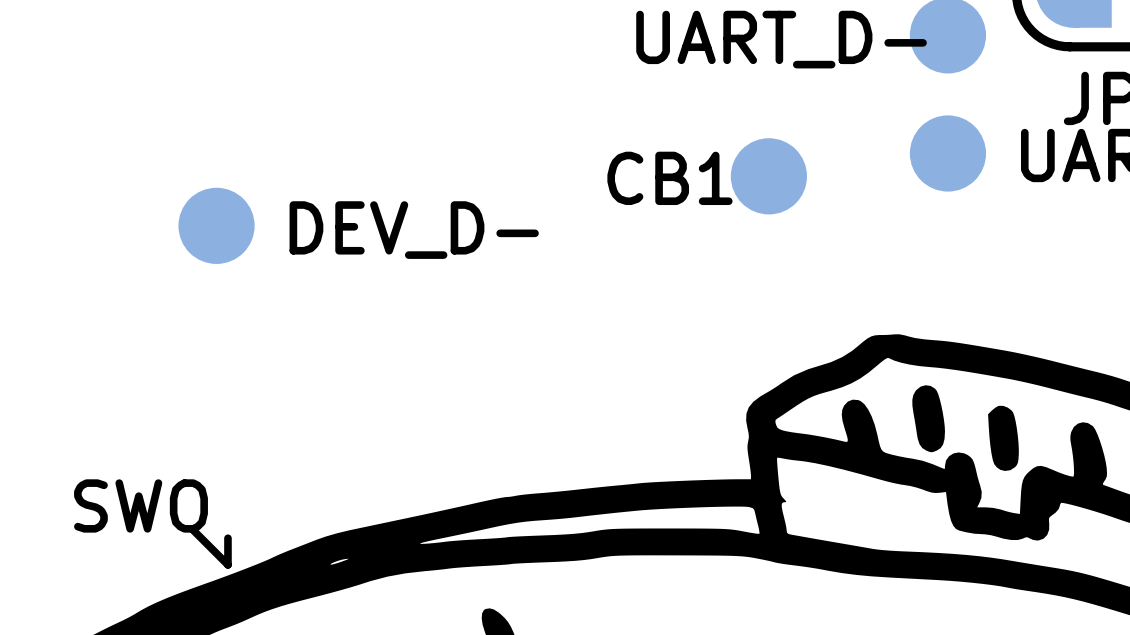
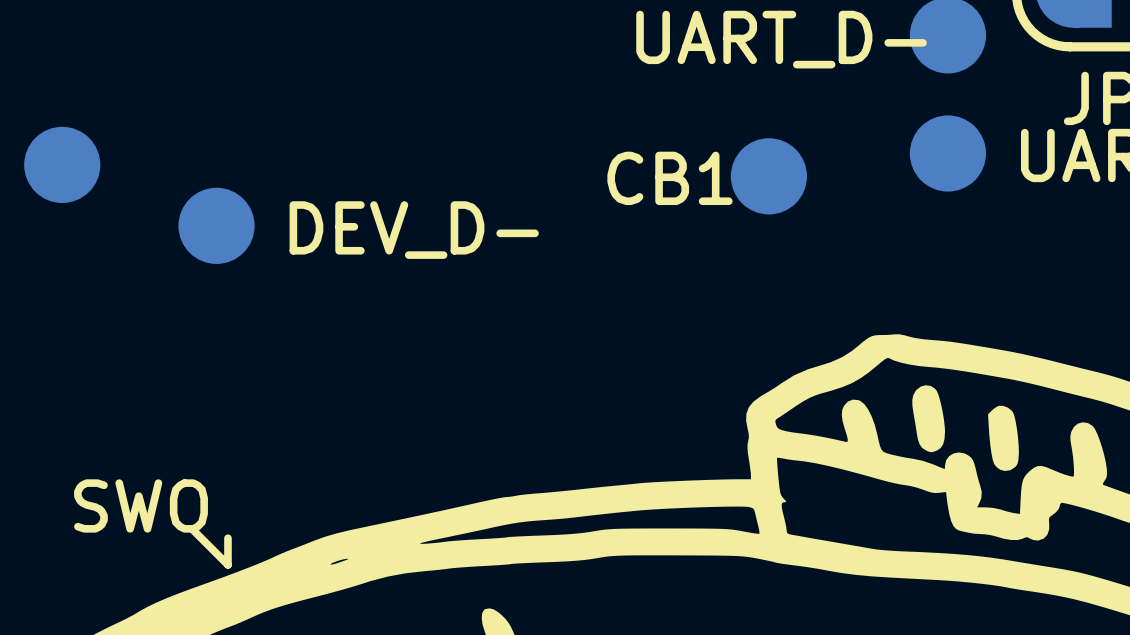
part: none -> (62, 164)

